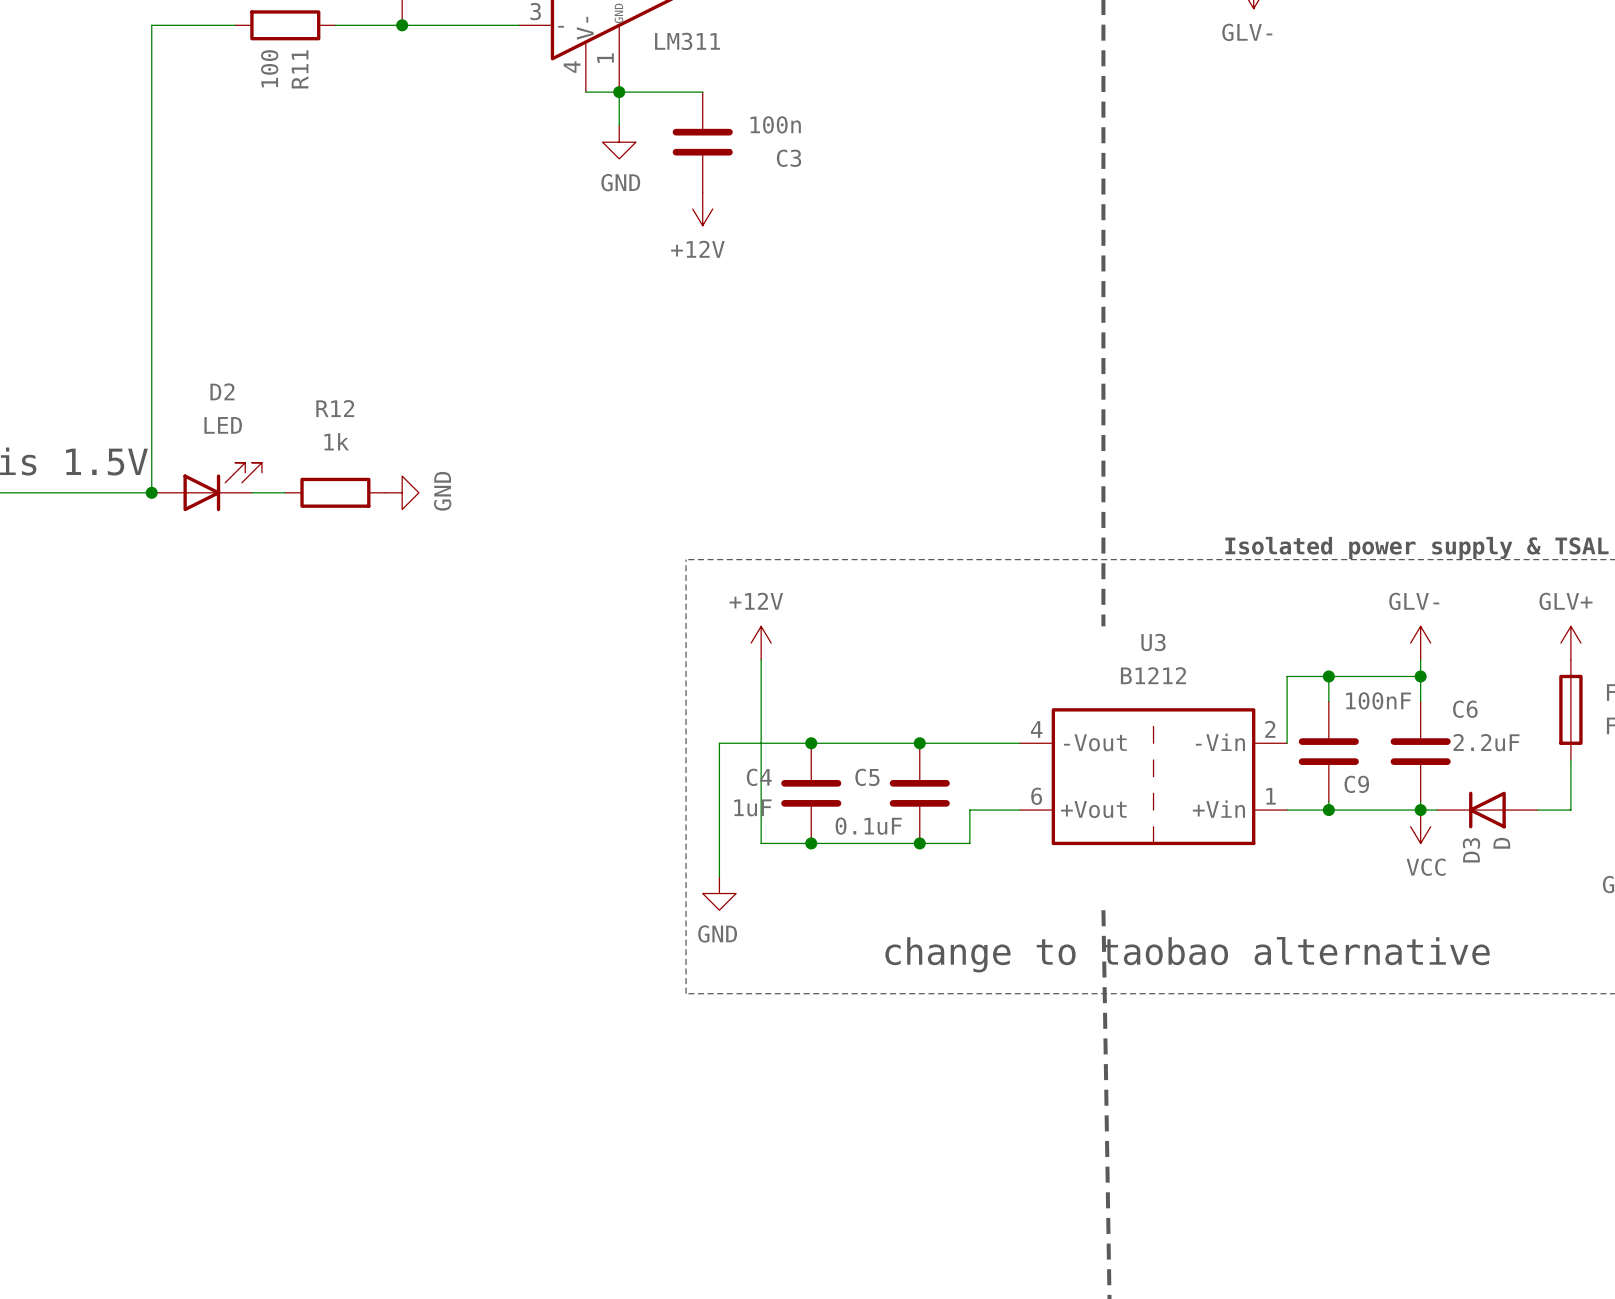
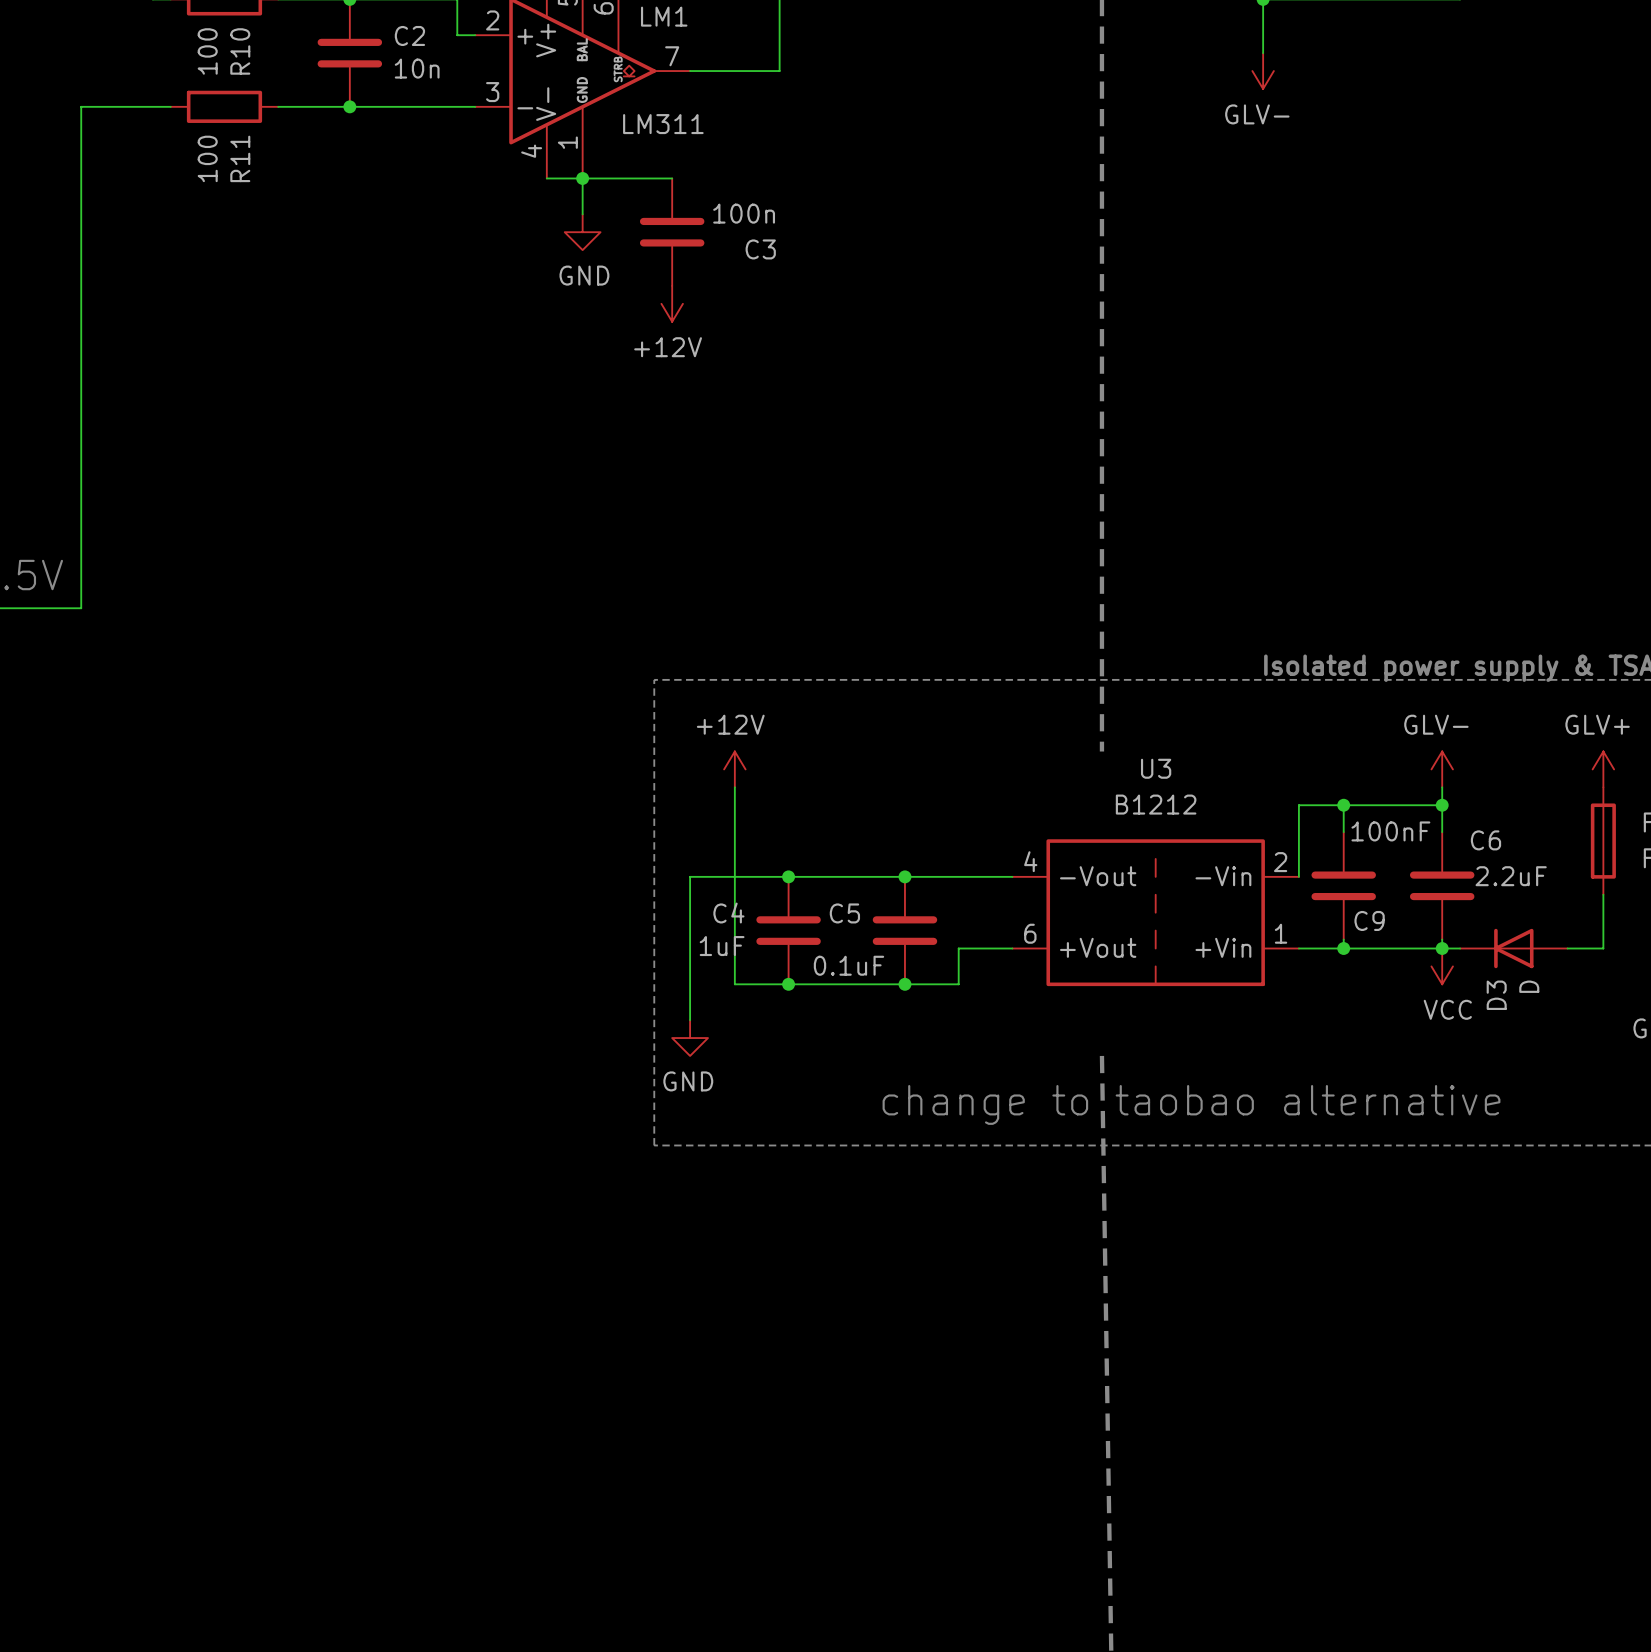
D2: LED (206, 486) -> none
junction: (151, 492) -> none
wire: (251, 492) (285, 492) -> none
R12: 1k (335, 492) -> none
power symbol: GND (402, 492) -> none

